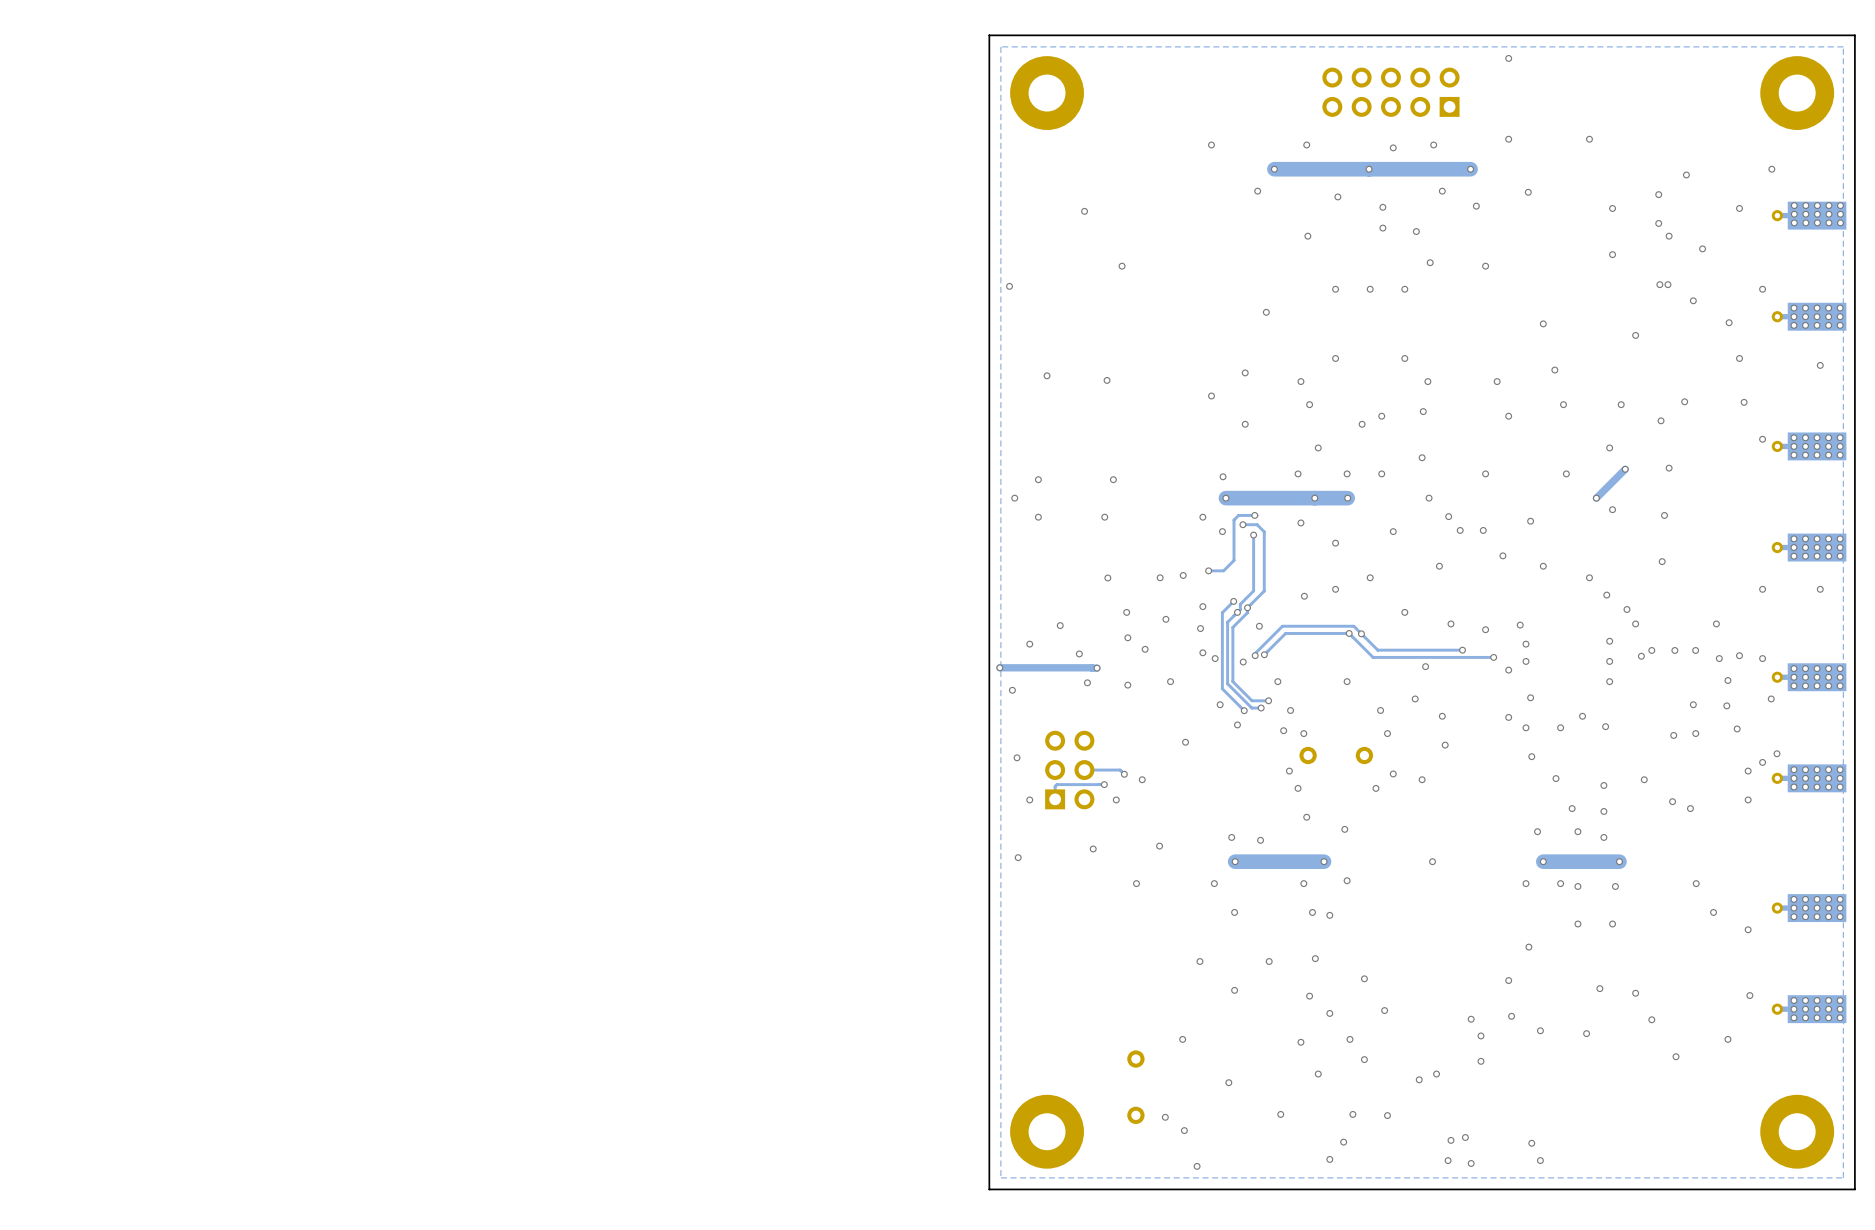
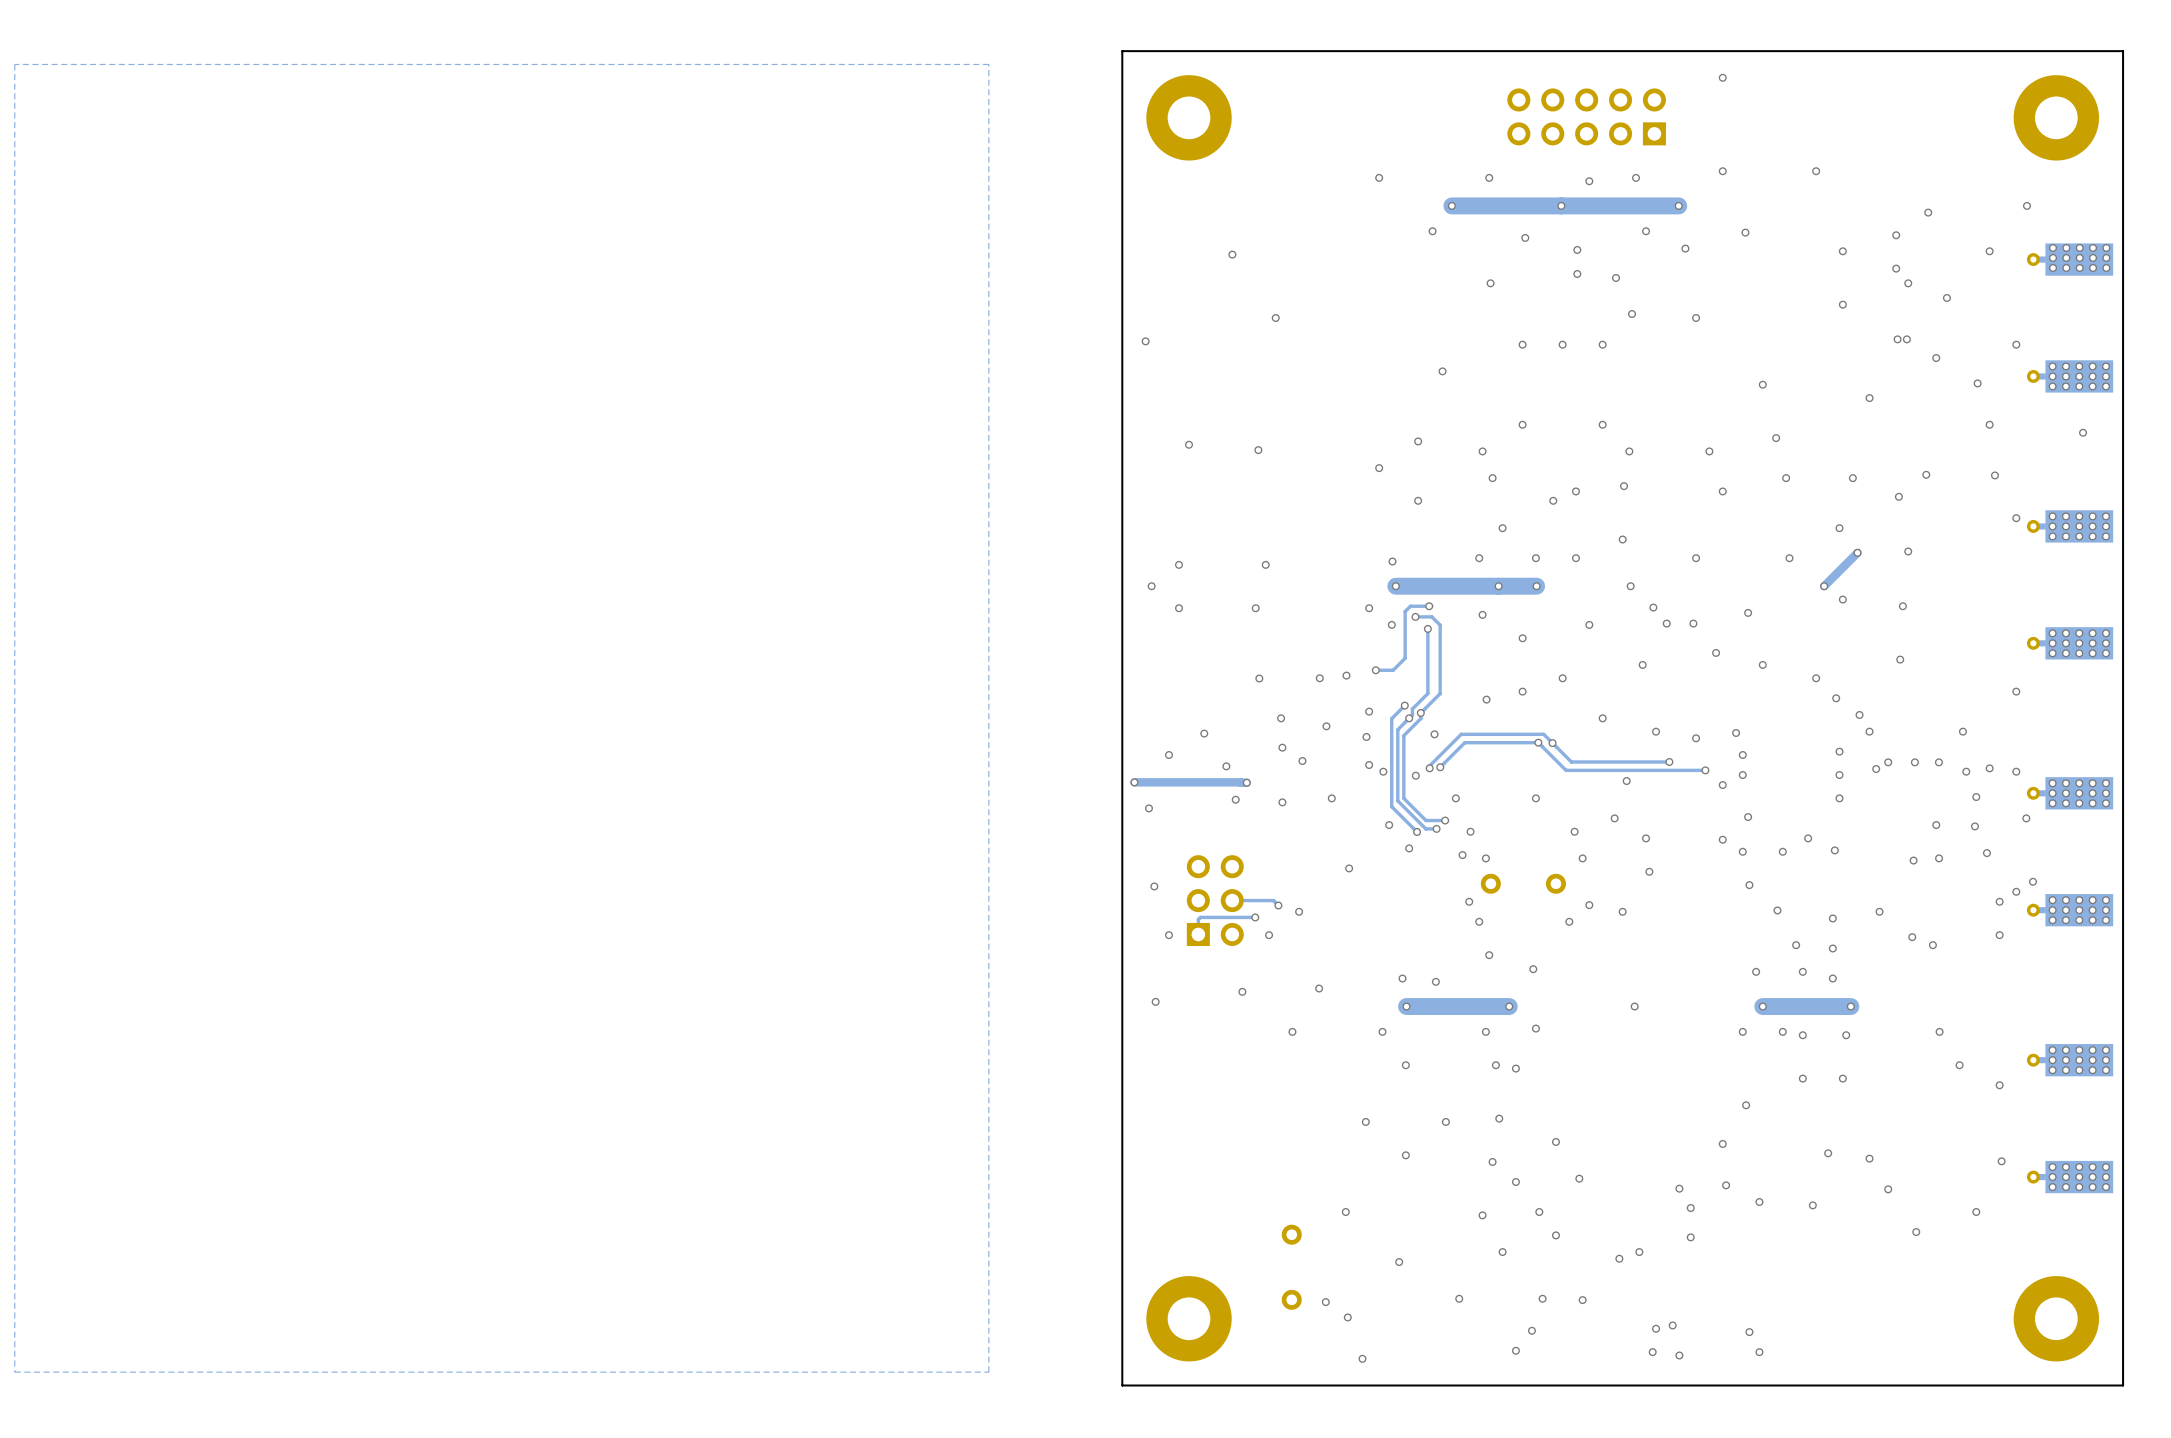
zone outline: none -> (988, 64) (14, 64) (14, 1372) (988, 1372) (988, 64)
zone outline: (1843, 46) (1000, 46) (1000, 1177) (1843, 1177) (1843, 46) -> none
via: (1820, 589) -> none

